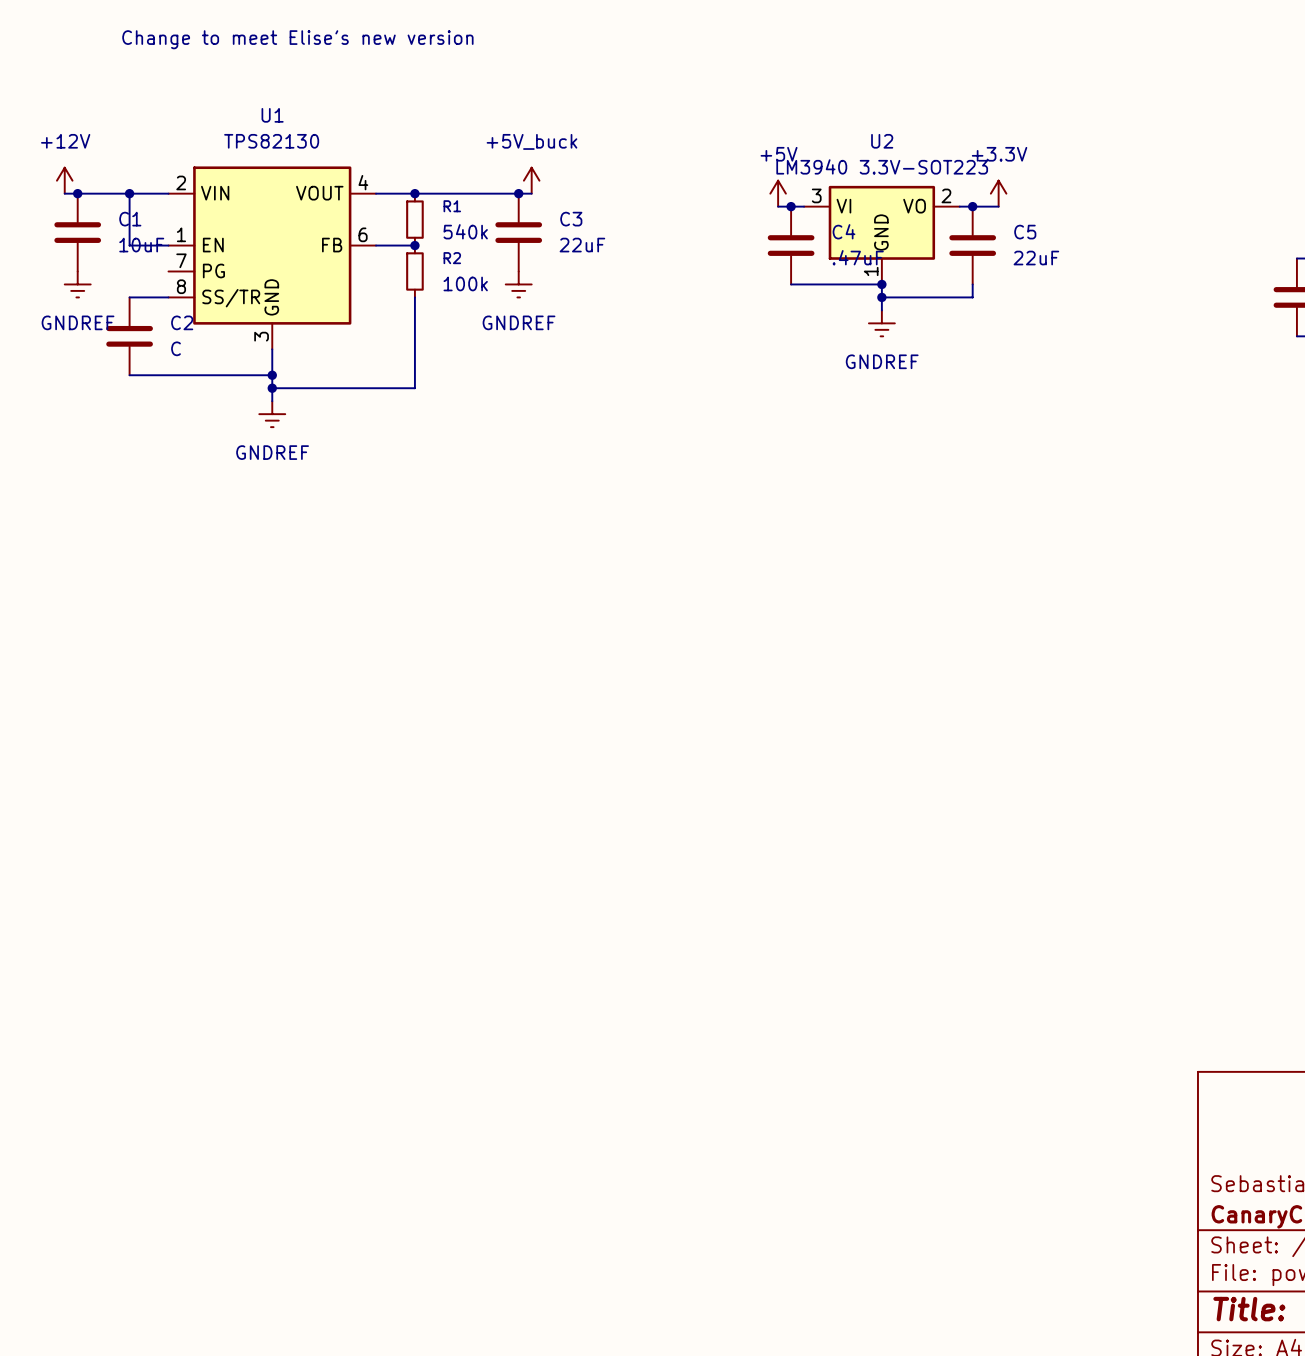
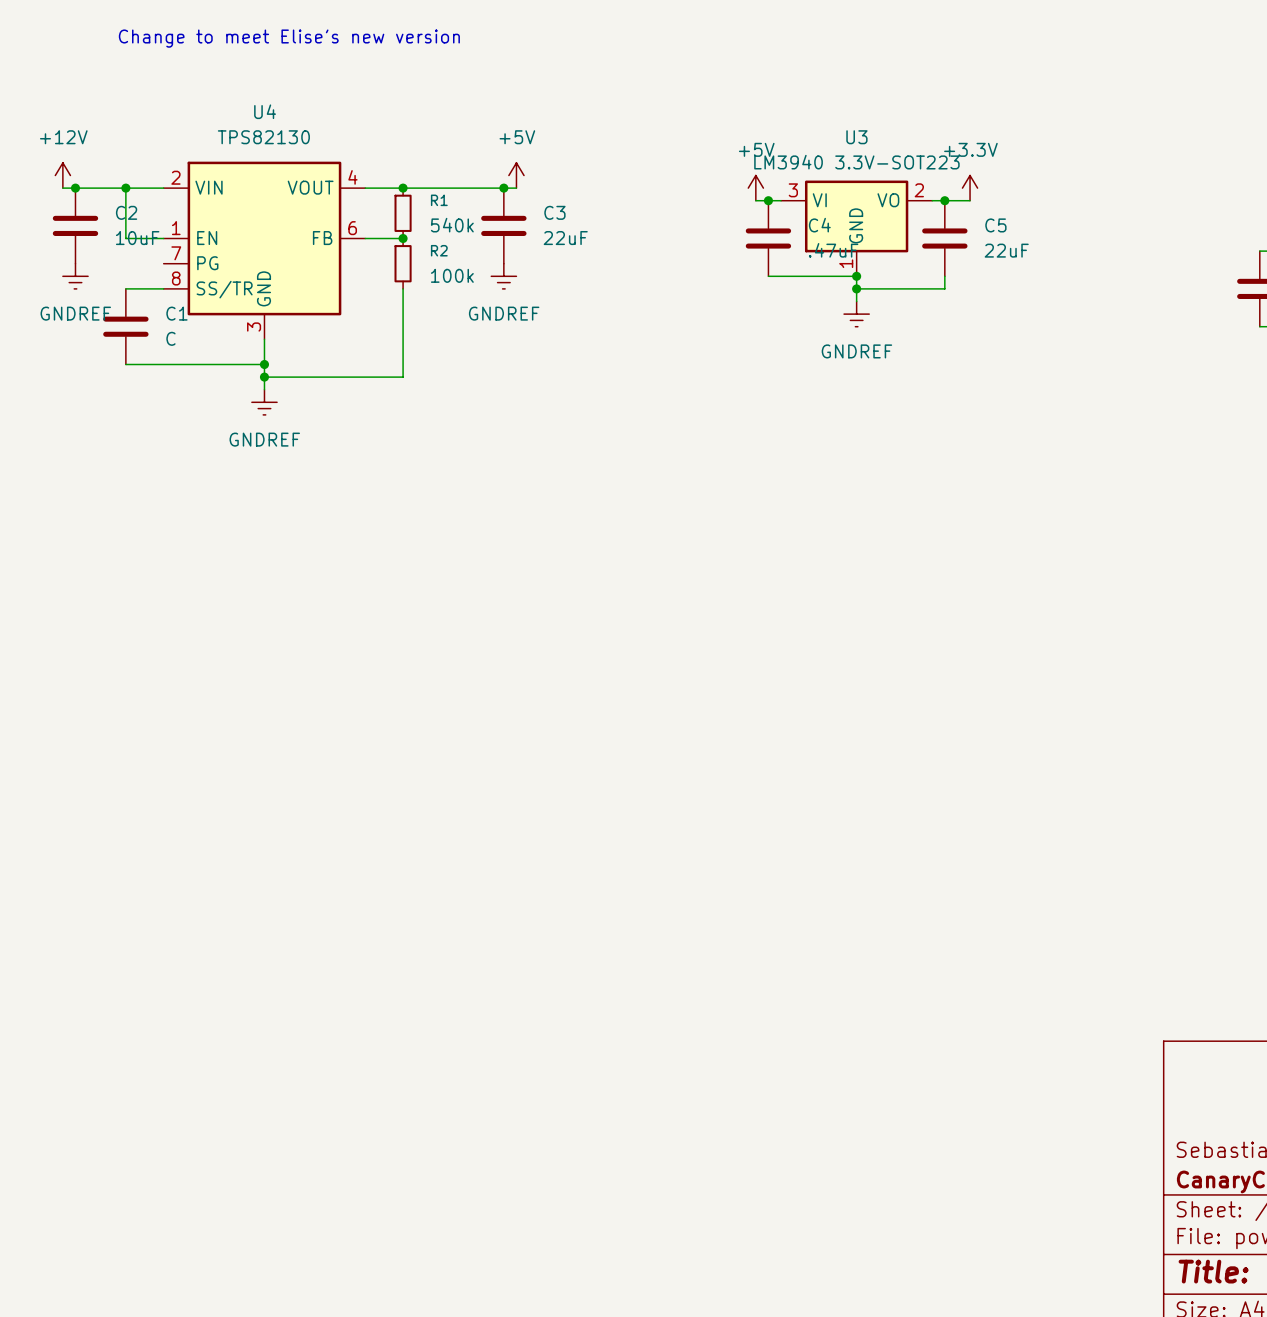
U1 name: U1 (272, 115) -> U4 (265, 111)
U2 name: U2 (882, 141) -> U3 (856, 137)
power symbol: +5V_buck (531, 180) -> +5V (516, 175)
C1 name: C1 (130, 219) -> C2 (126, 212)
C2 name: C2 (182, 322) -> C1 (176, 313)

